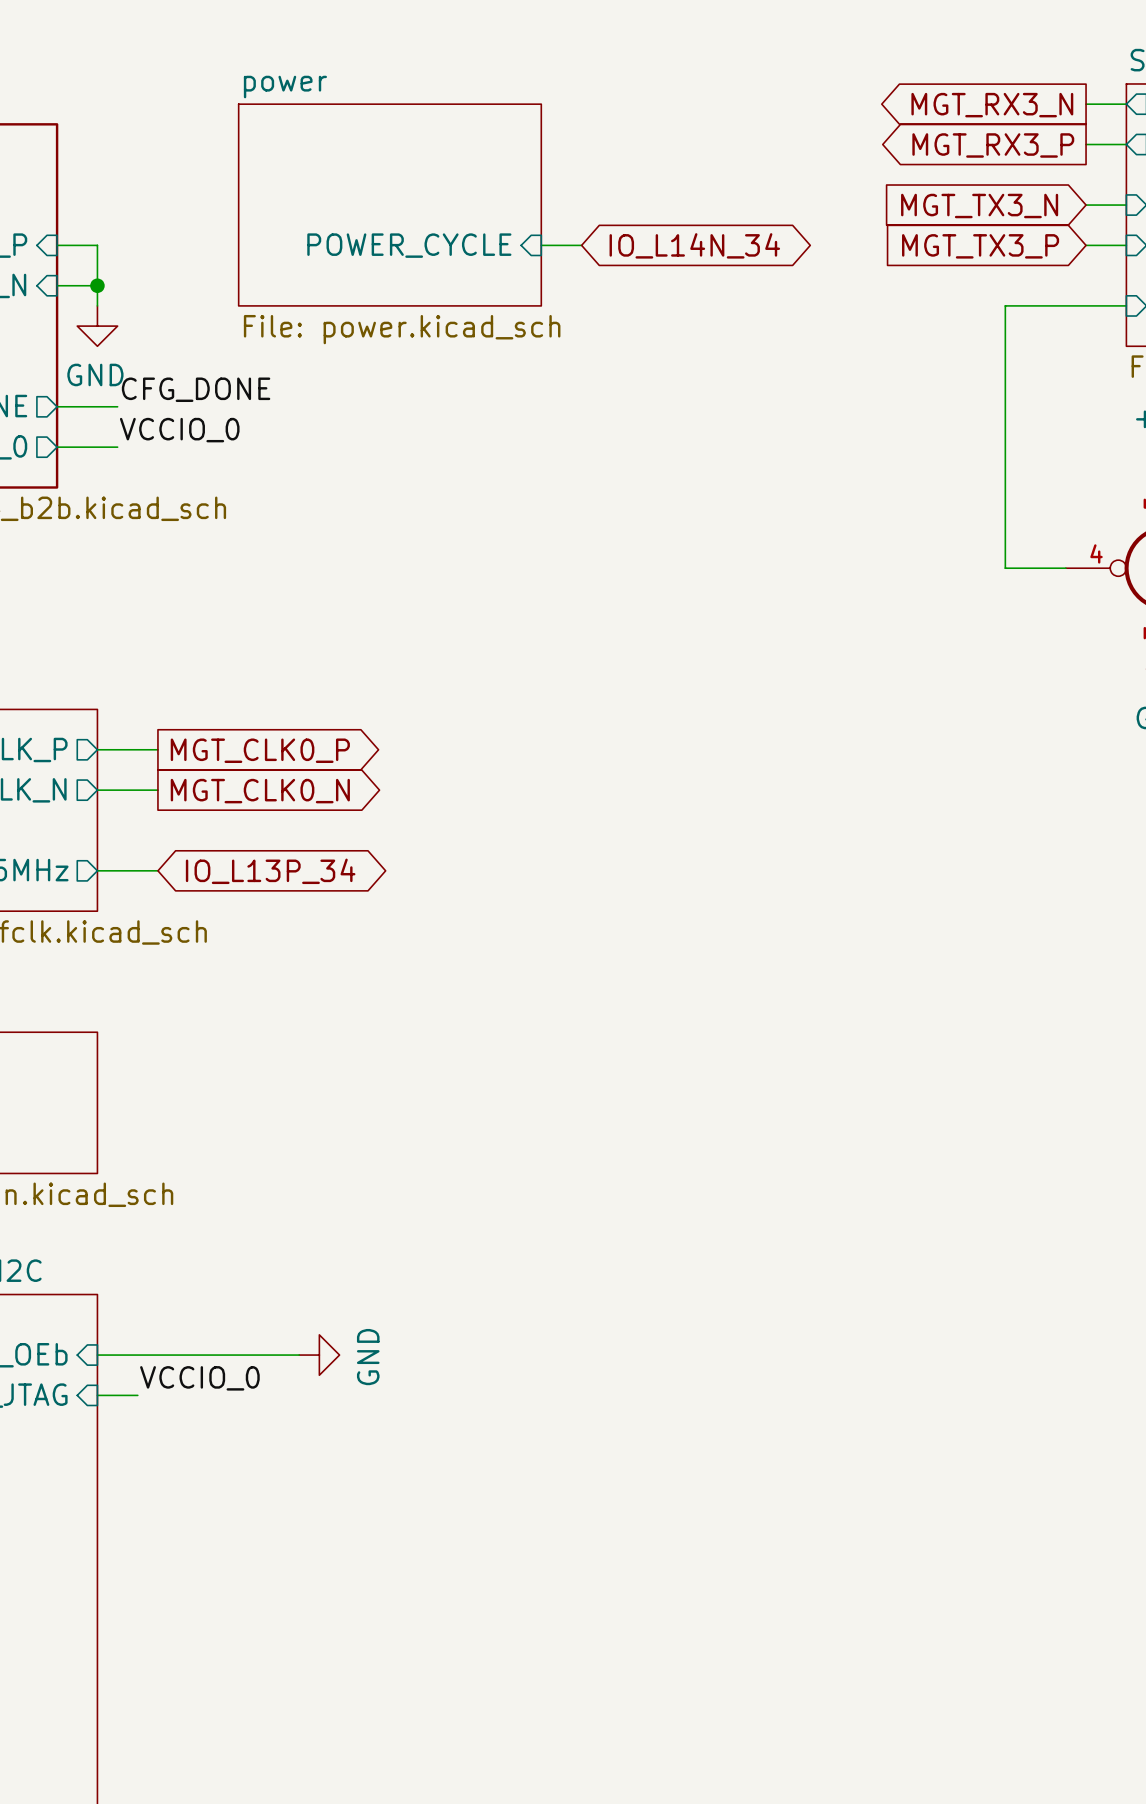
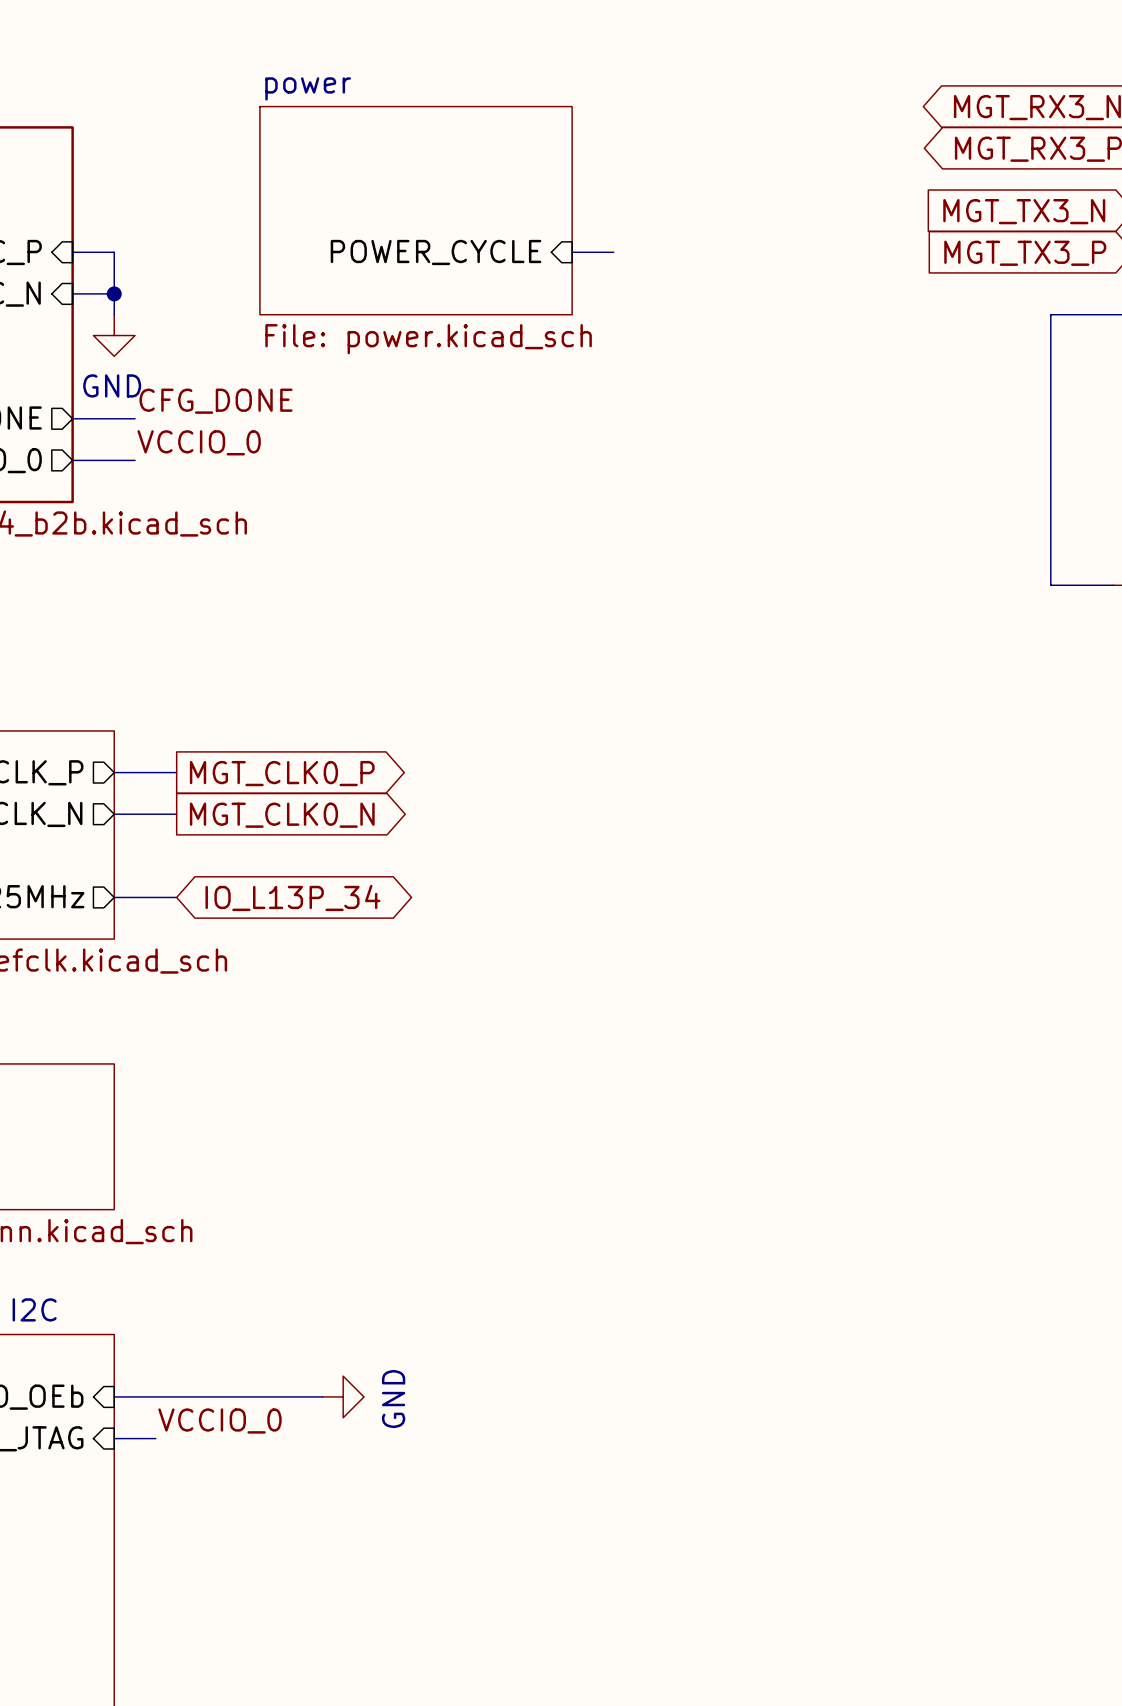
global label: IO_L14N_34 (694, 245) -> none

